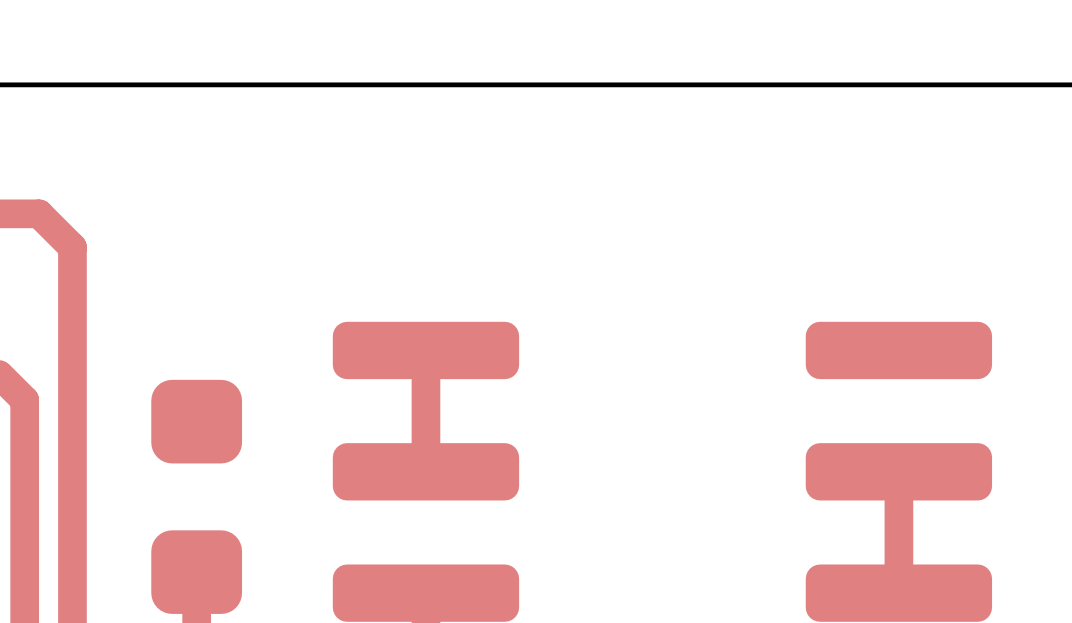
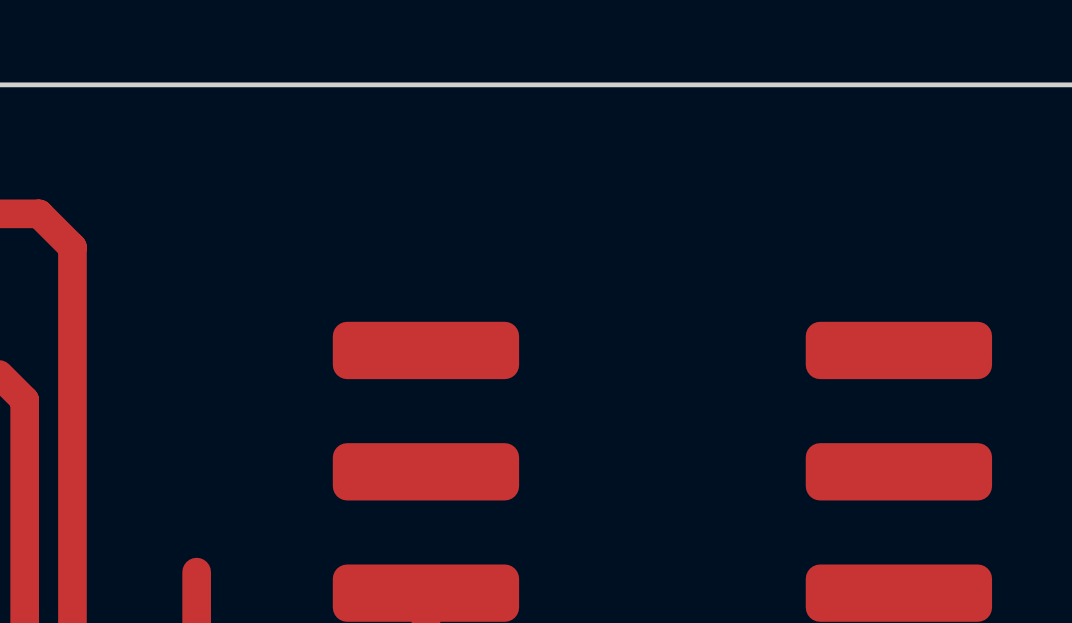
top track: (425, 350) (425, 471) -> none
top track: (898, 471) (898, 593) -> none
part: (196, 496) -> none

